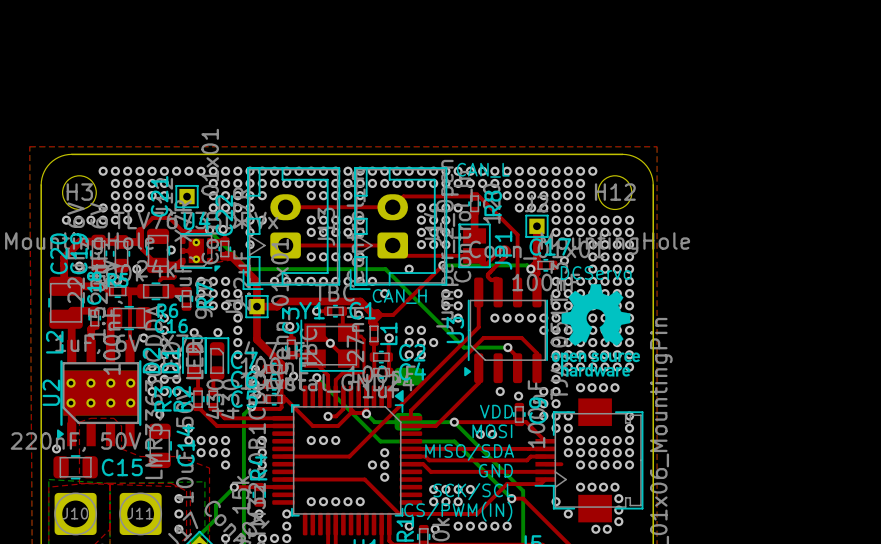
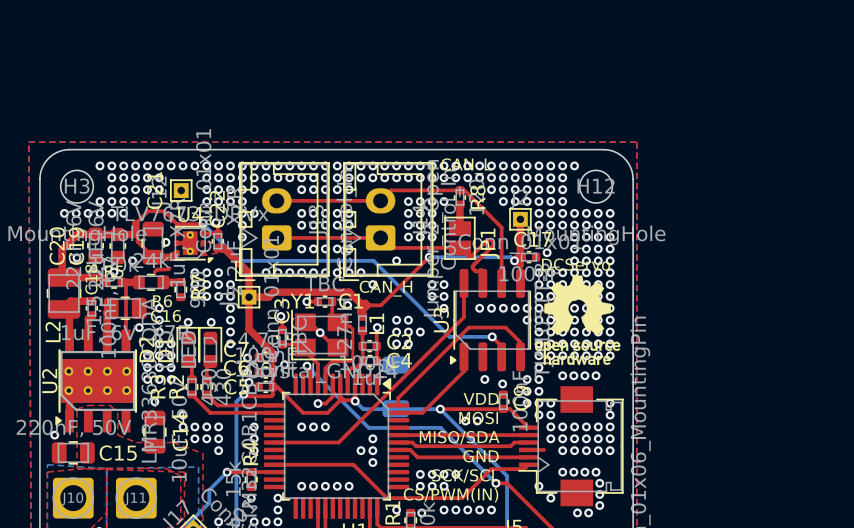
via: (178, 498) -> none
via: (178, 513) -> none
via: (178, 529) -> none

